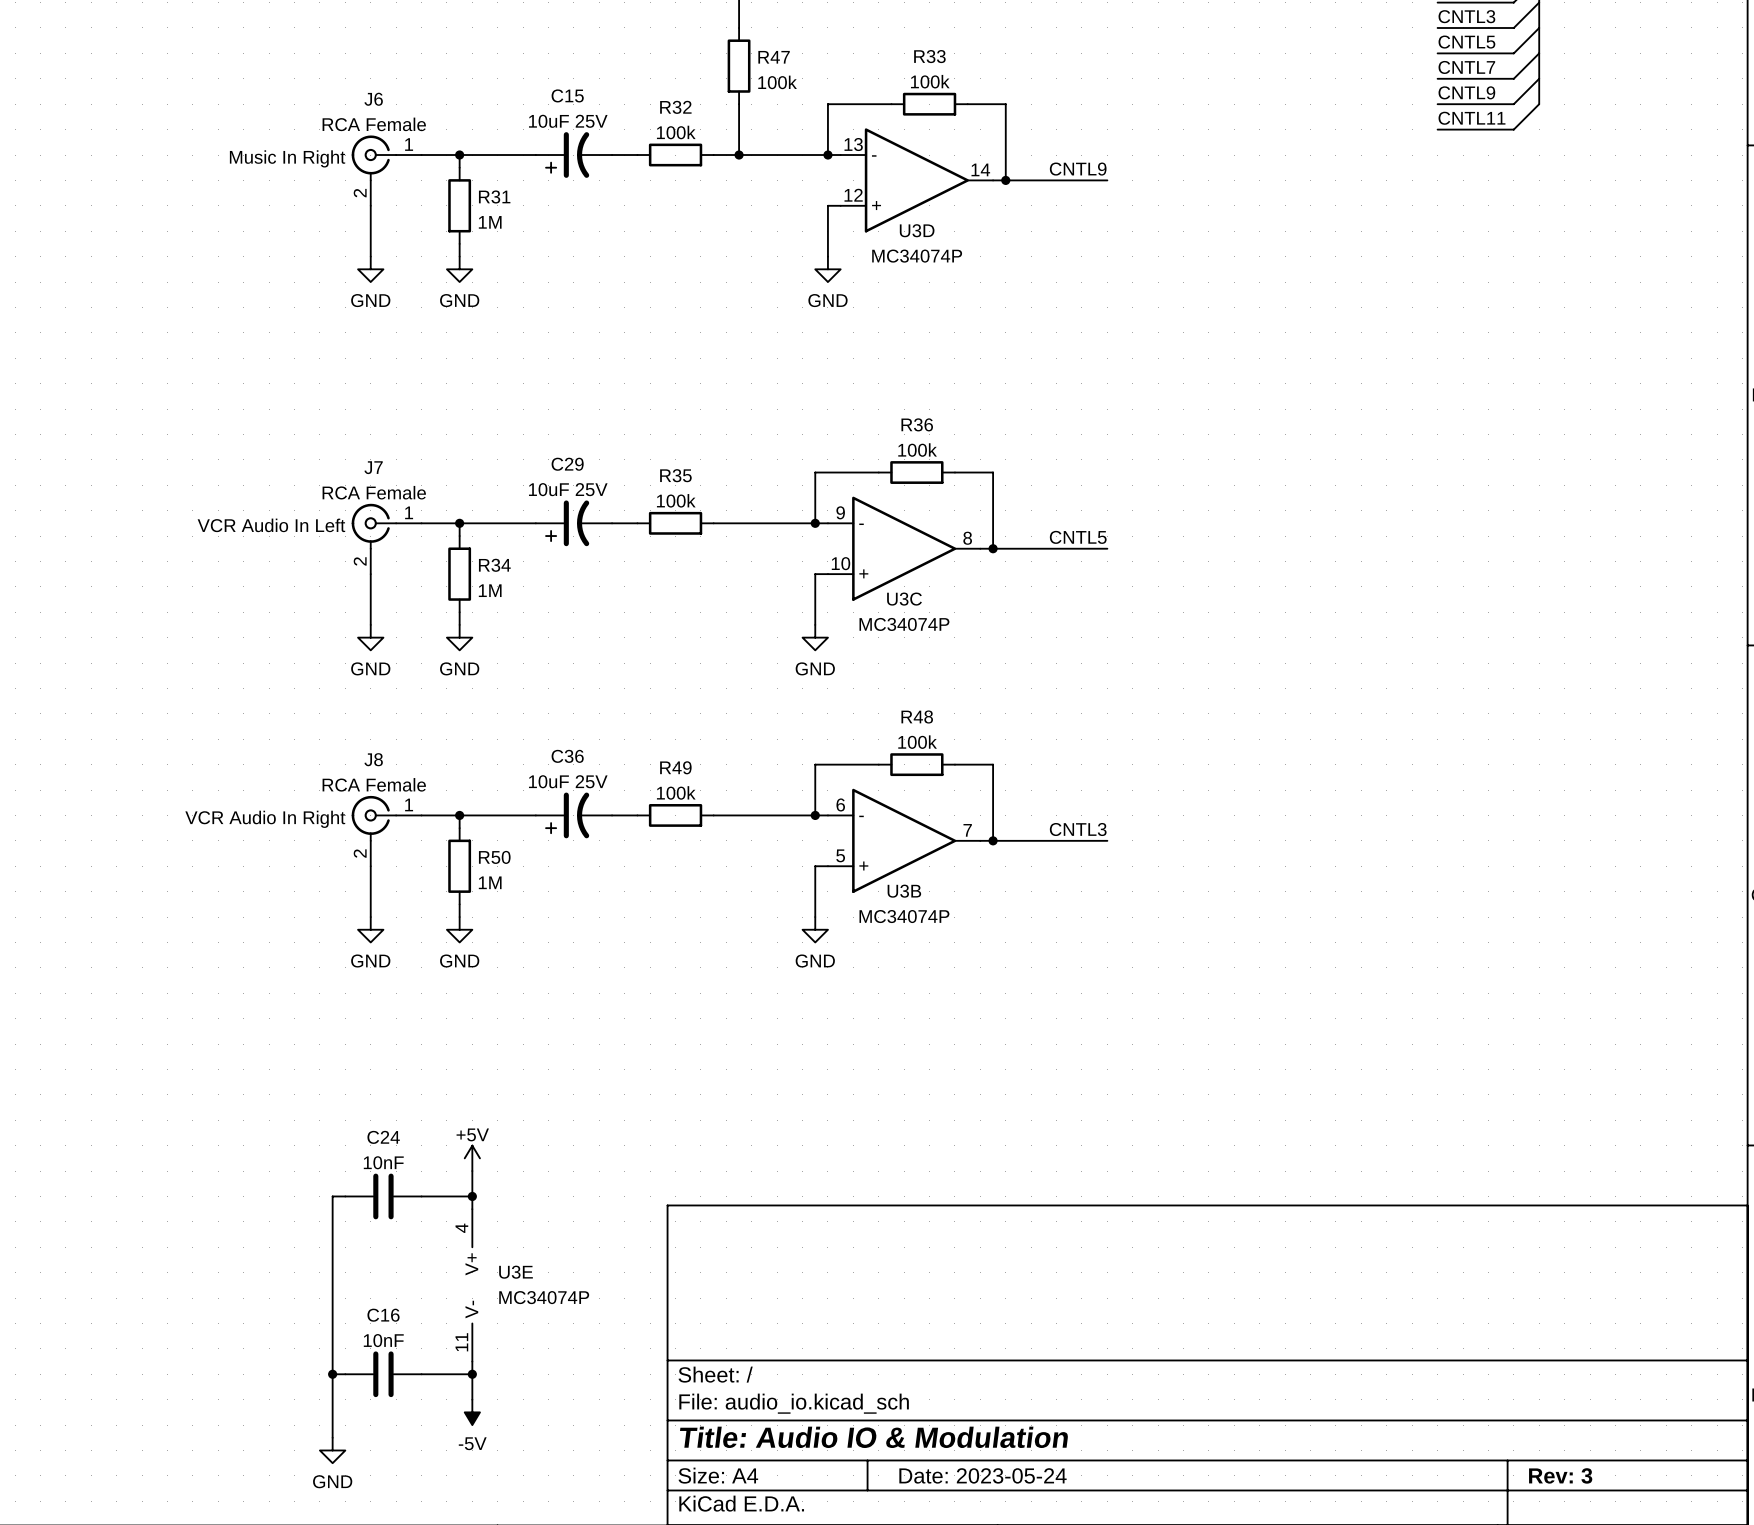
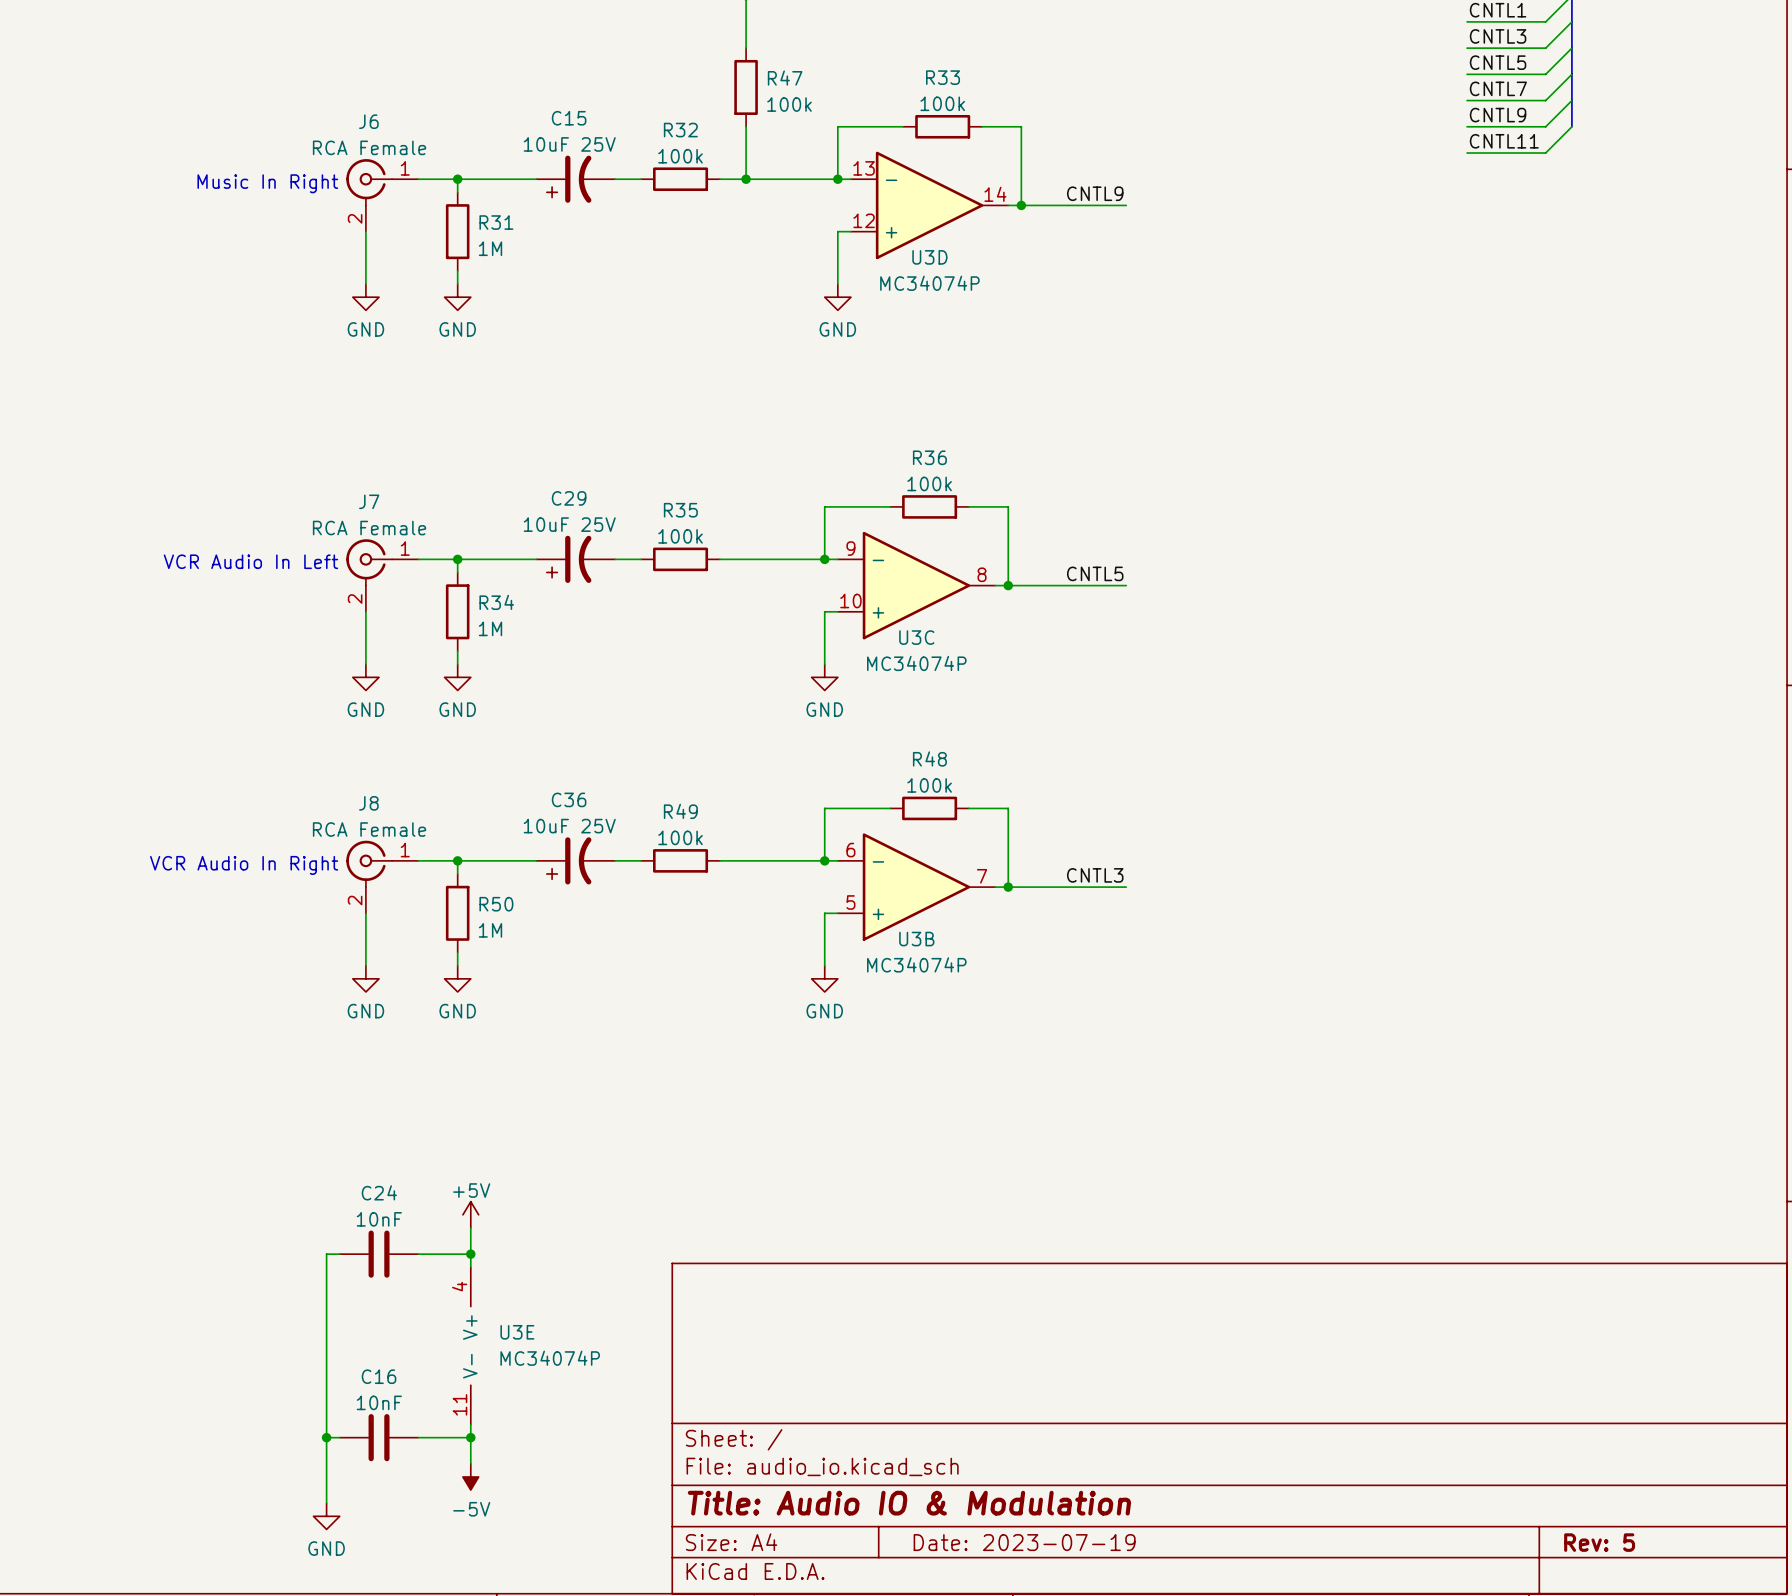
title block: Date: 2023-05-24 (983, 1475) -> Date: 2023-07-19 (1024, 1542)
title block: Rev: 3 (1560, 1475) -> Rev: 5 (1599, 1542)

